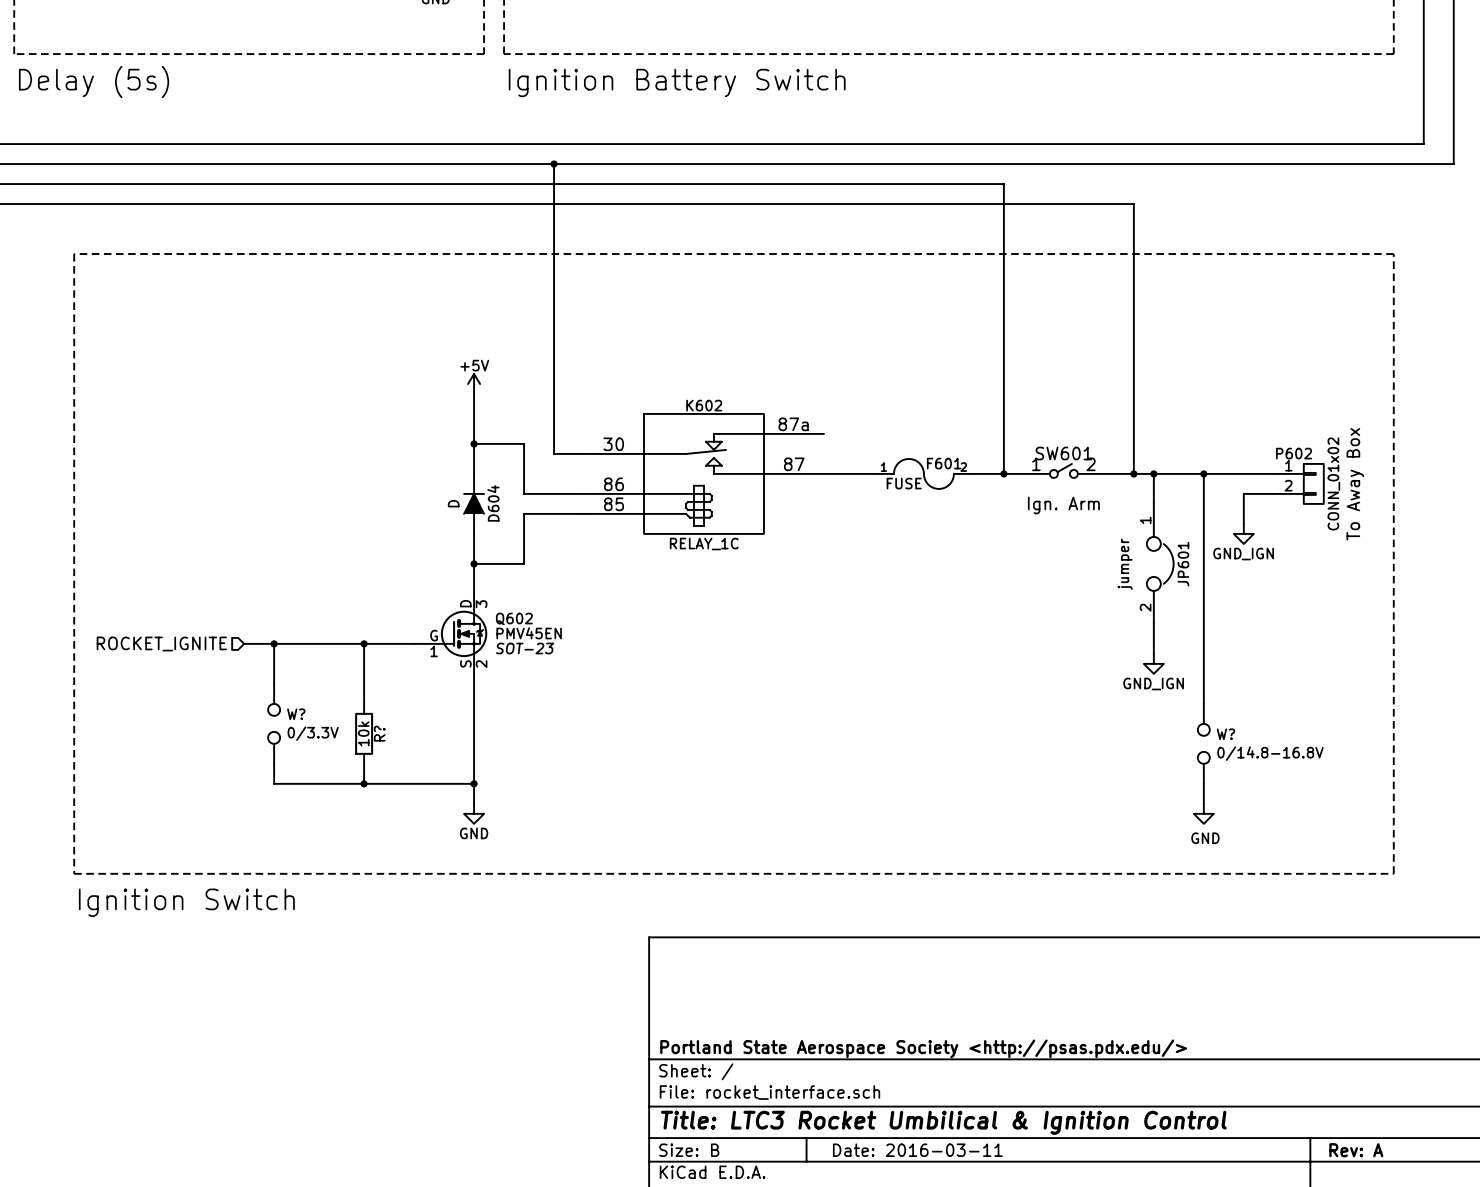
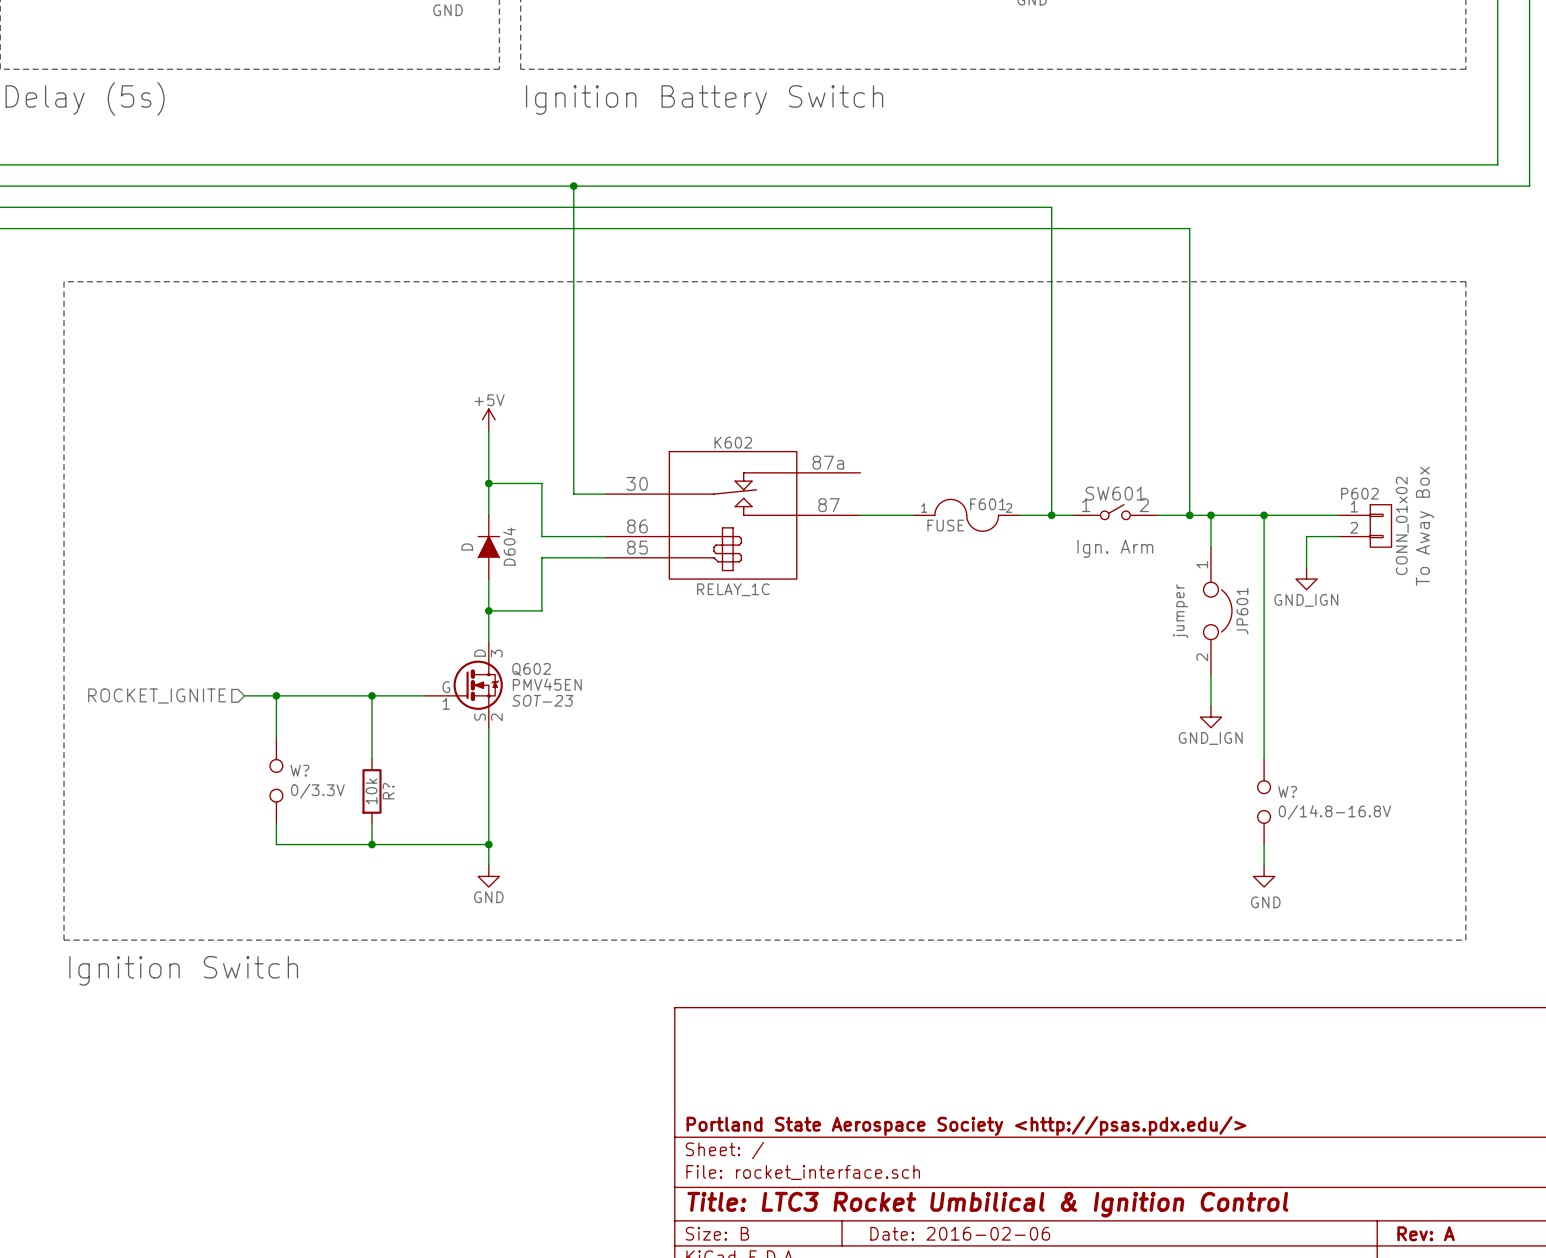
title block: Date: 2016-03-11 (917, 1150) -> Date: 2016-02-06 (960, 1233)

